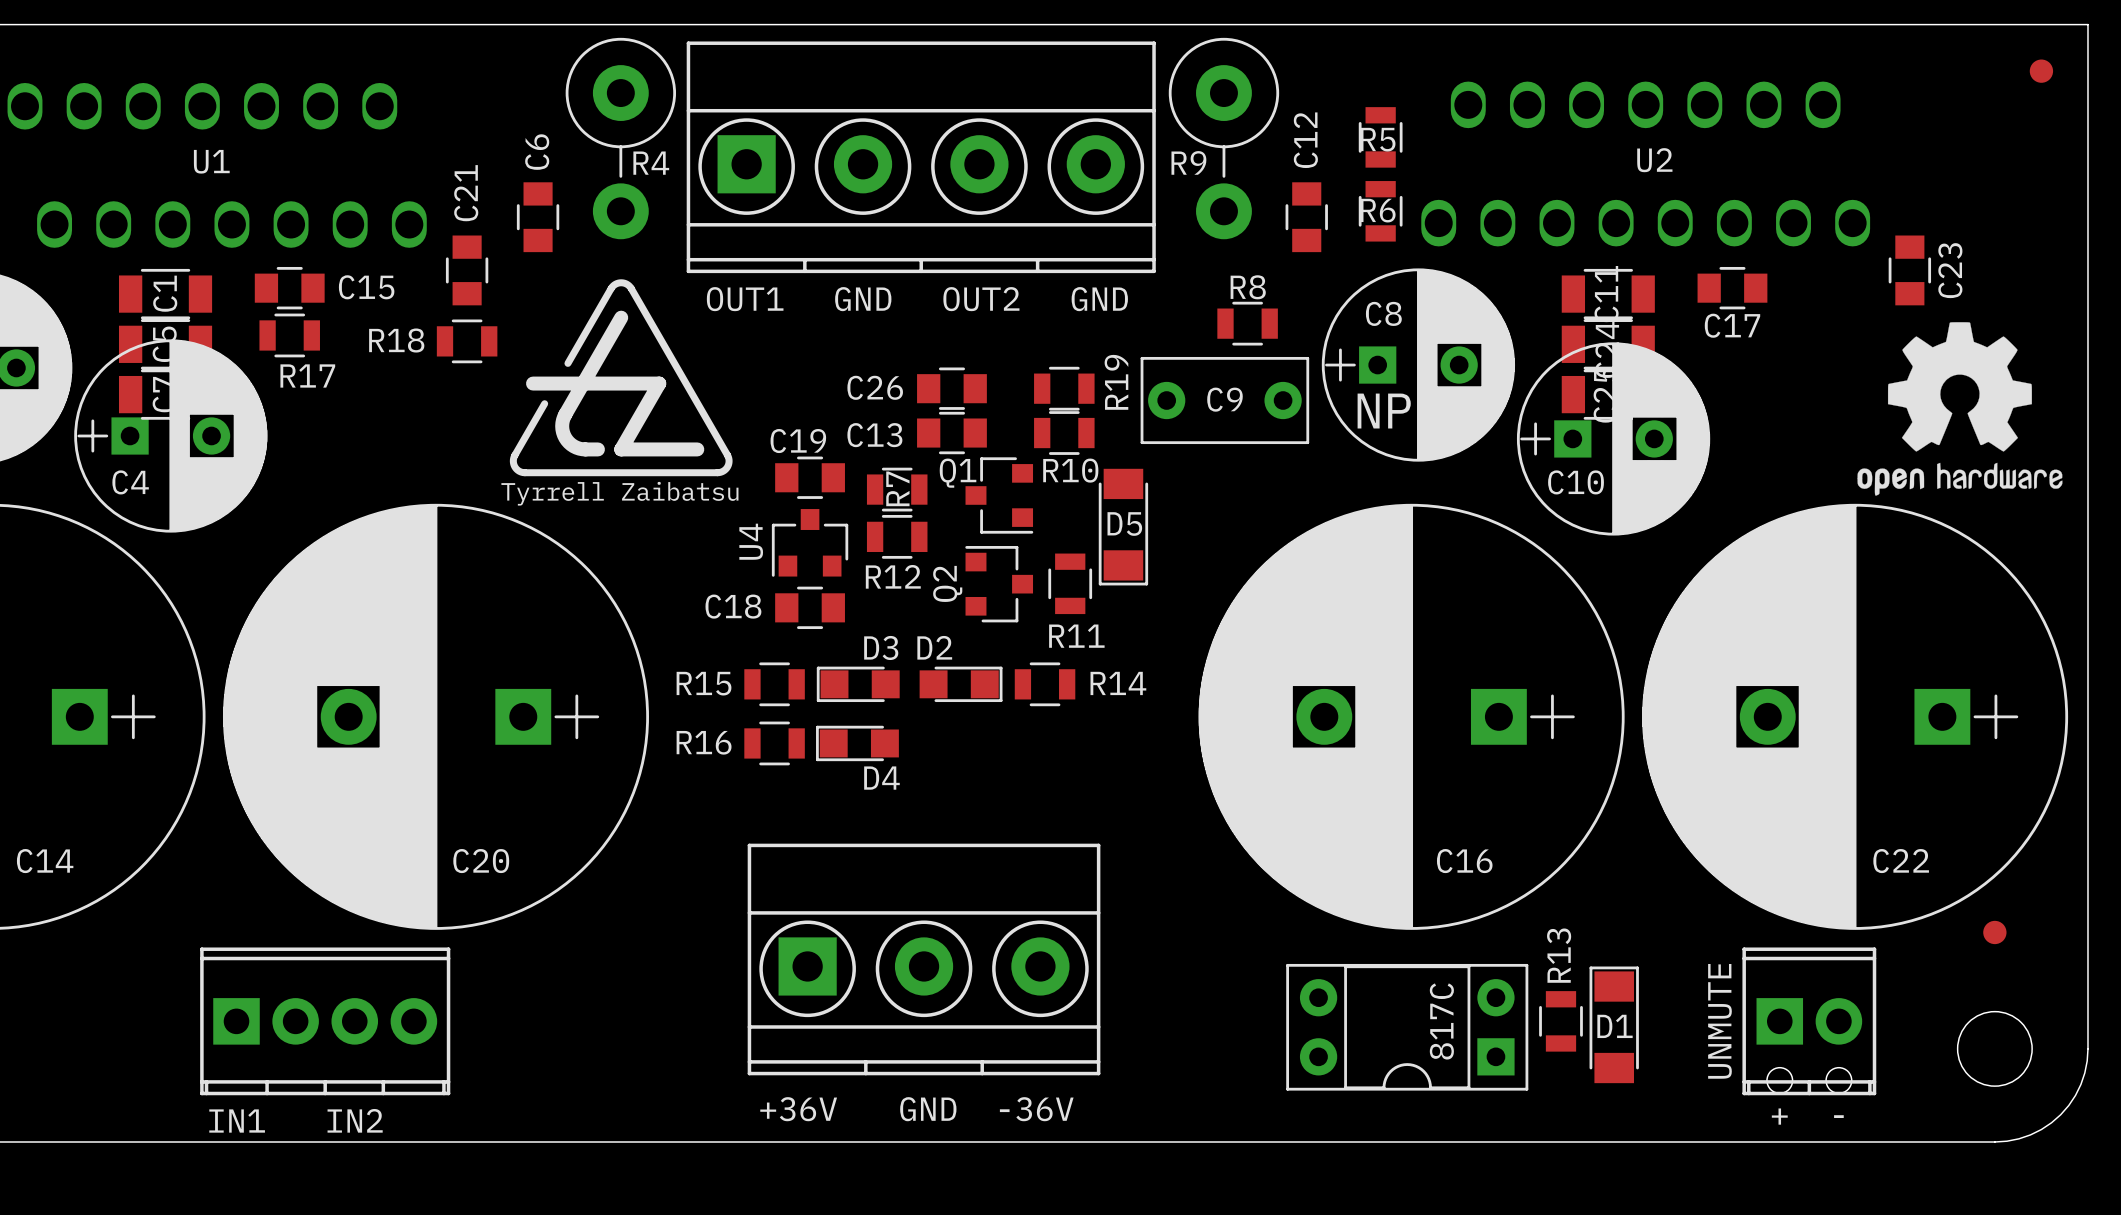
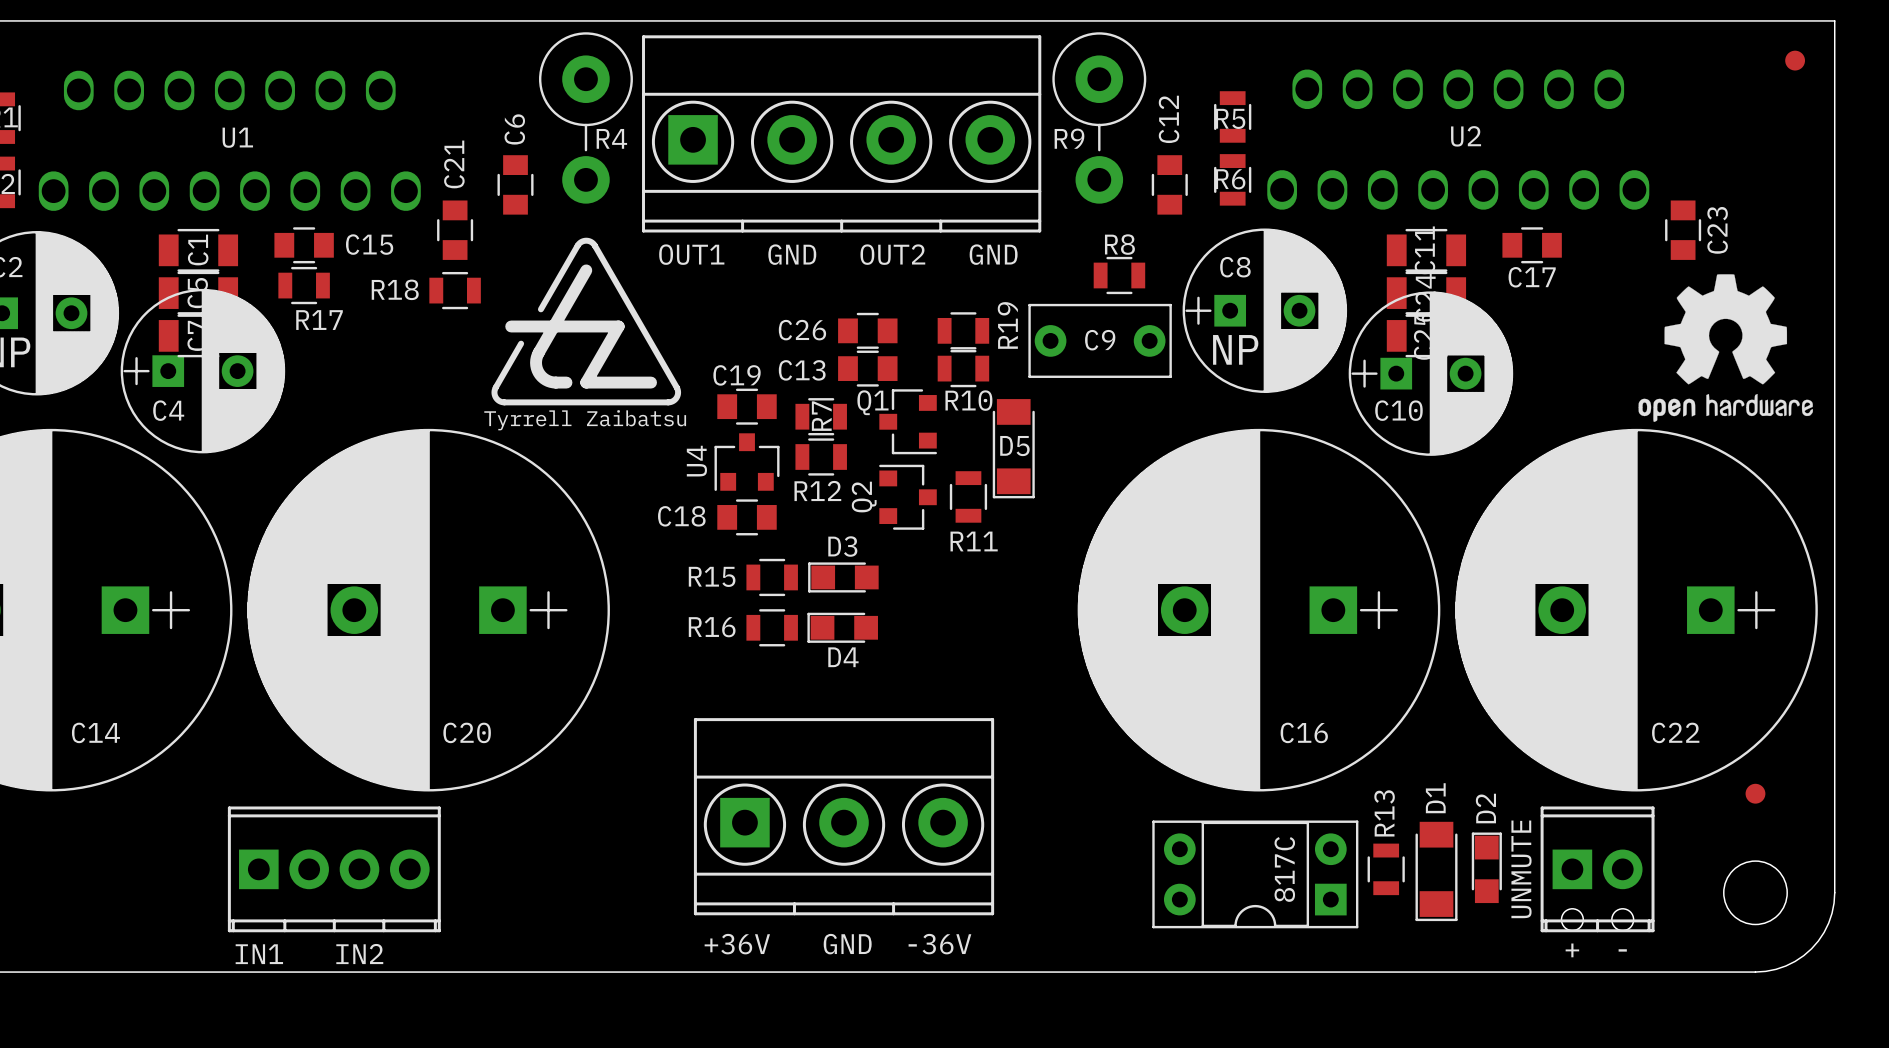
D3 name position: D3 (881, 647) -> D3 (842, 546)
R15 position: (774, 684) -> (772, 577)
D3 position: (858, 684) -> (843, 577)
D2 rotation: 0° (961, 684) -> 90° counterclockwise (1486, 867)
D2 position: (961, 684) -> (1486, 867)
R14: (1045, 684) -> none
R16 position: (774, 743) -> (772, 627)
D4 position: (857, 743) -> (842, 627)
D4 name position: D4 (881, 778) -> D4 (843, 657)
D1 rotation: 0° (1614, 1024) -> 180° (1436, 871)
D1 name position: D1 (1615, 1026) -> D1 (1435, 798)

